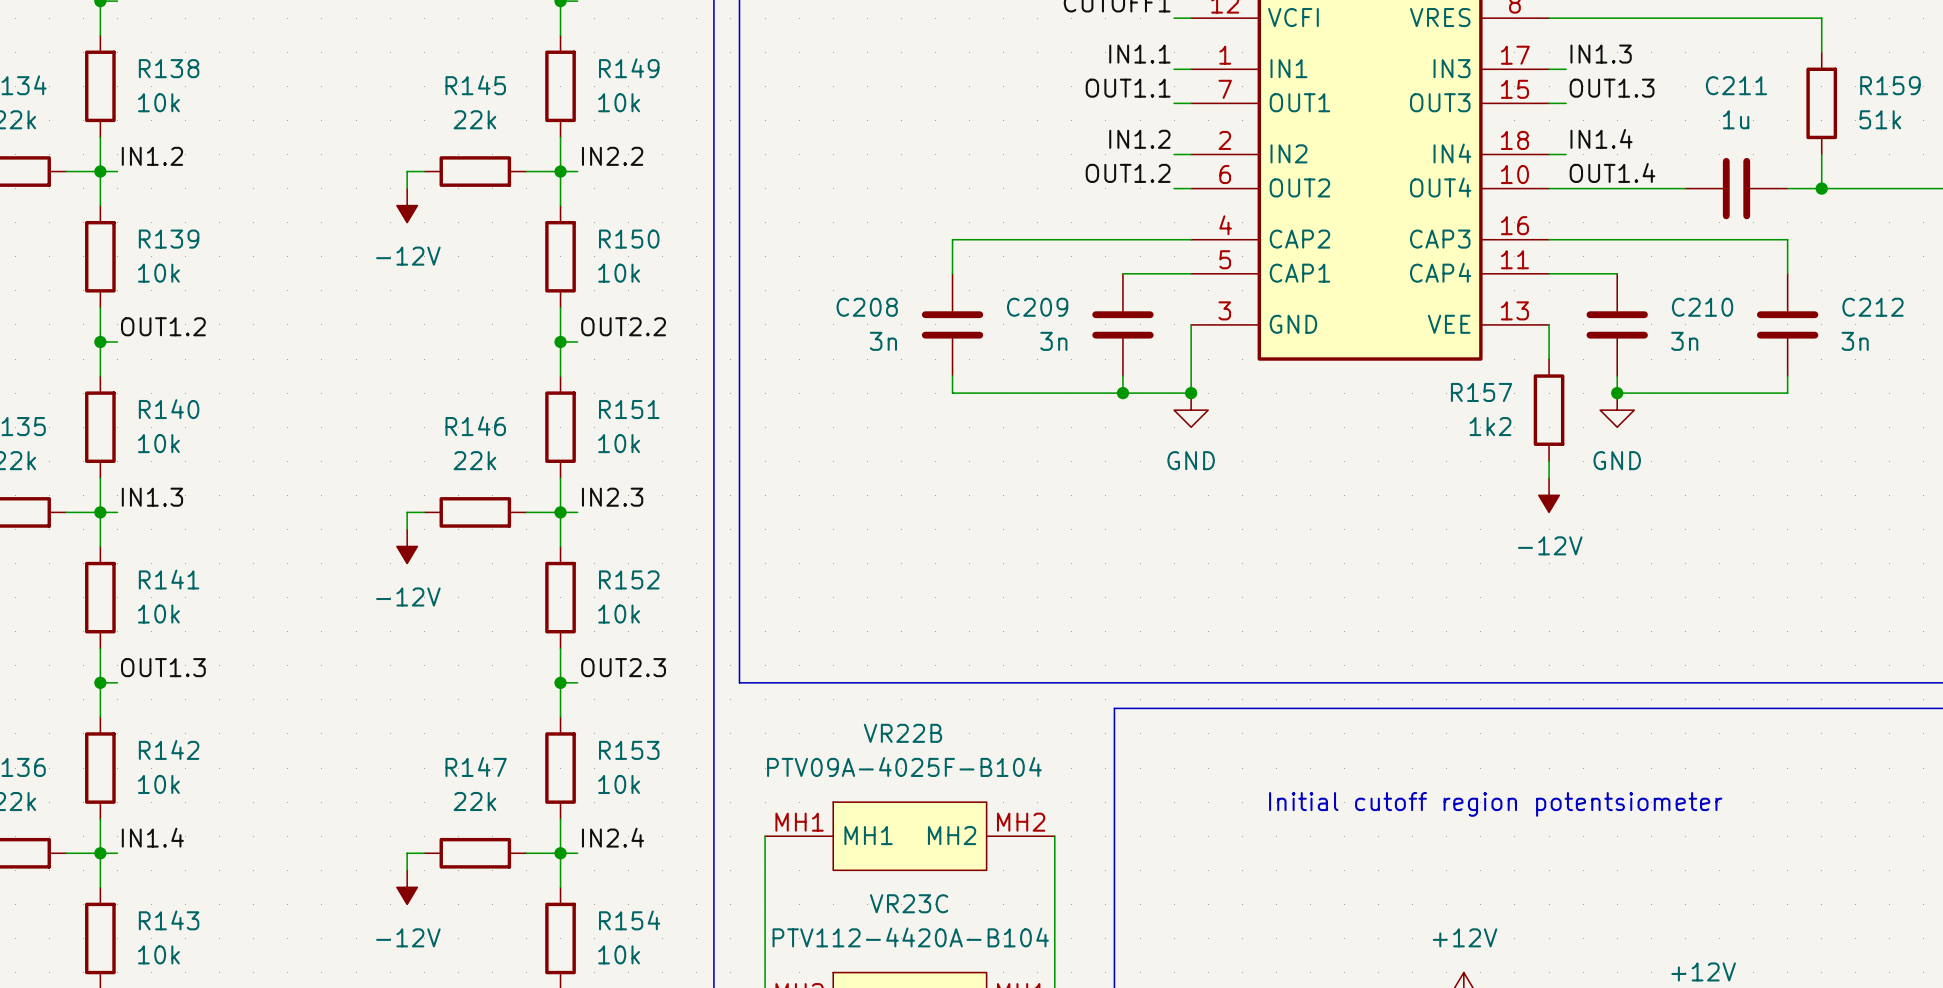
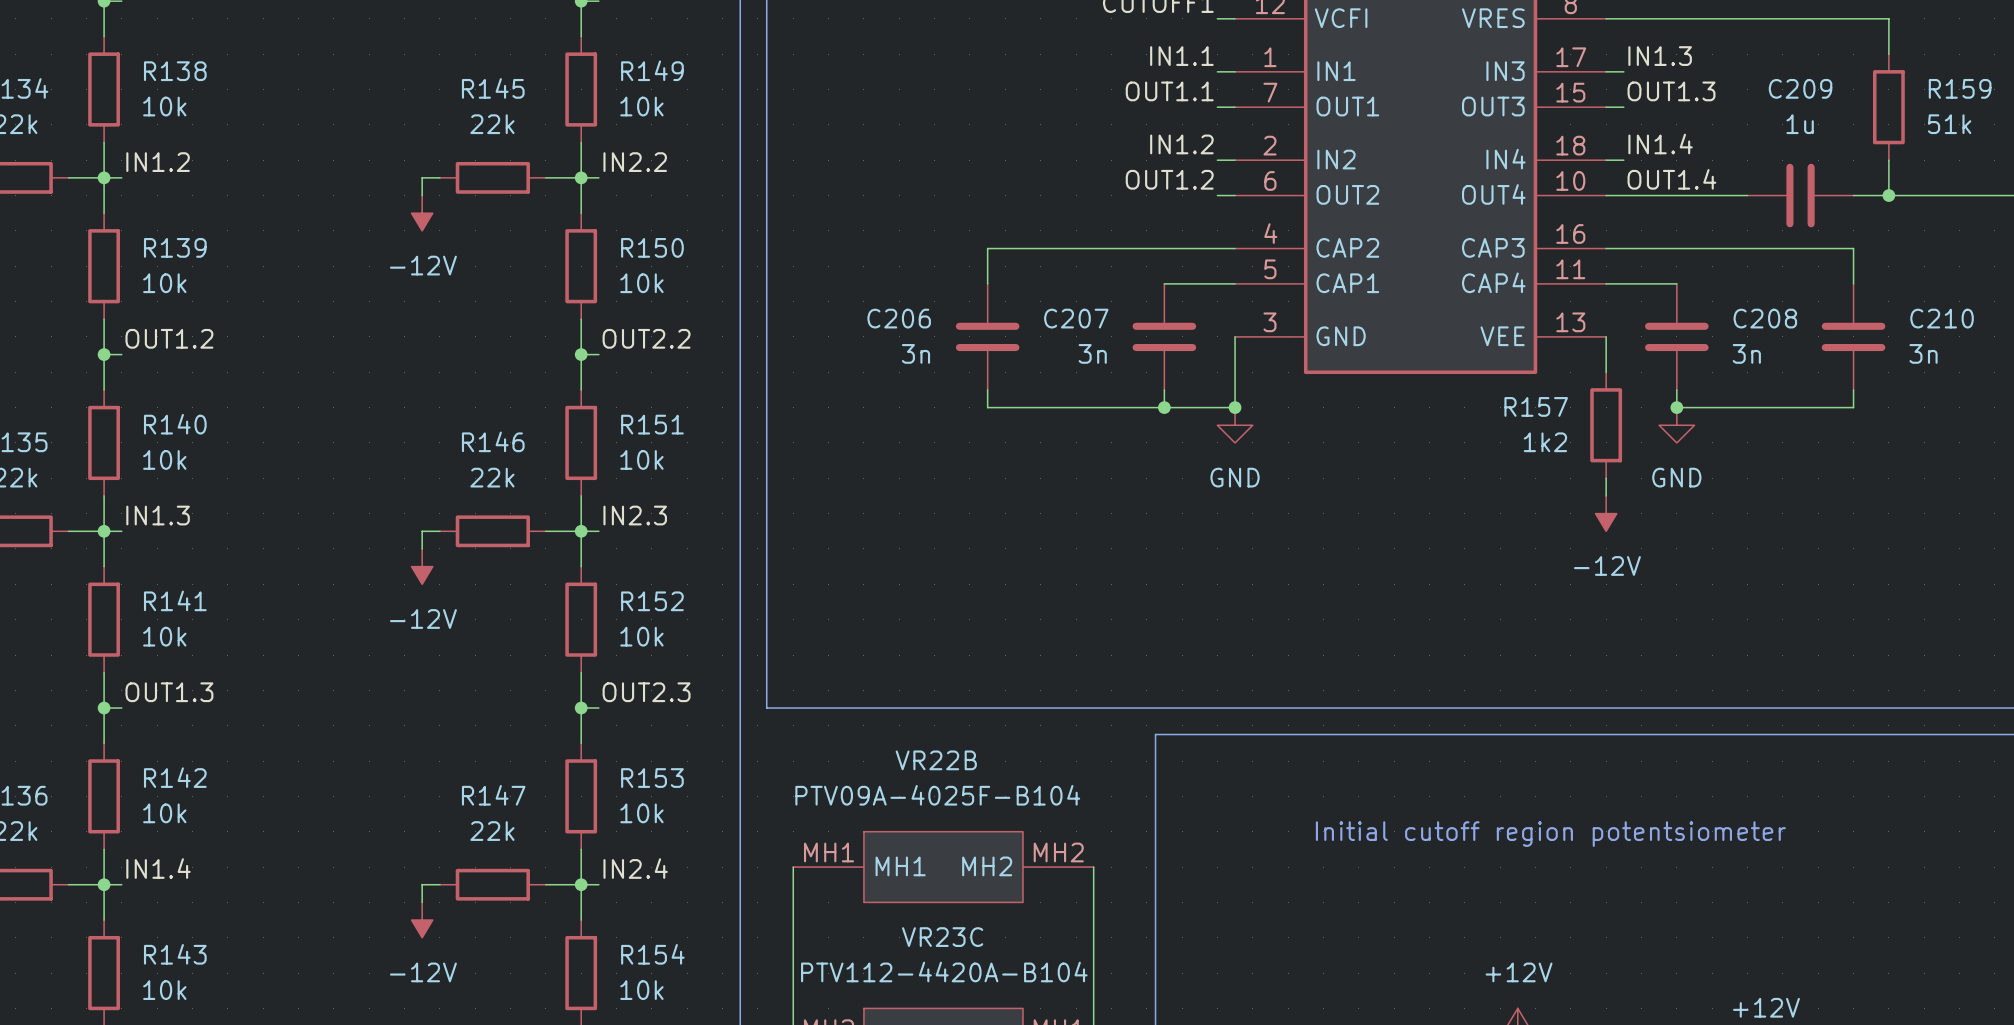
C211 name: C211 (1736, 85) -> C209 (1800, 88)
C208 name: C208 (867, 307) -> C206 (899, 318)
C209 name: C209 (1037, 307) -> C207 (1076, 318)
C210 name: C210 (1702, 307) -> C208 (1765, 318)
C212 name: C212 (1872, 307) -> C210 (1942, 318)

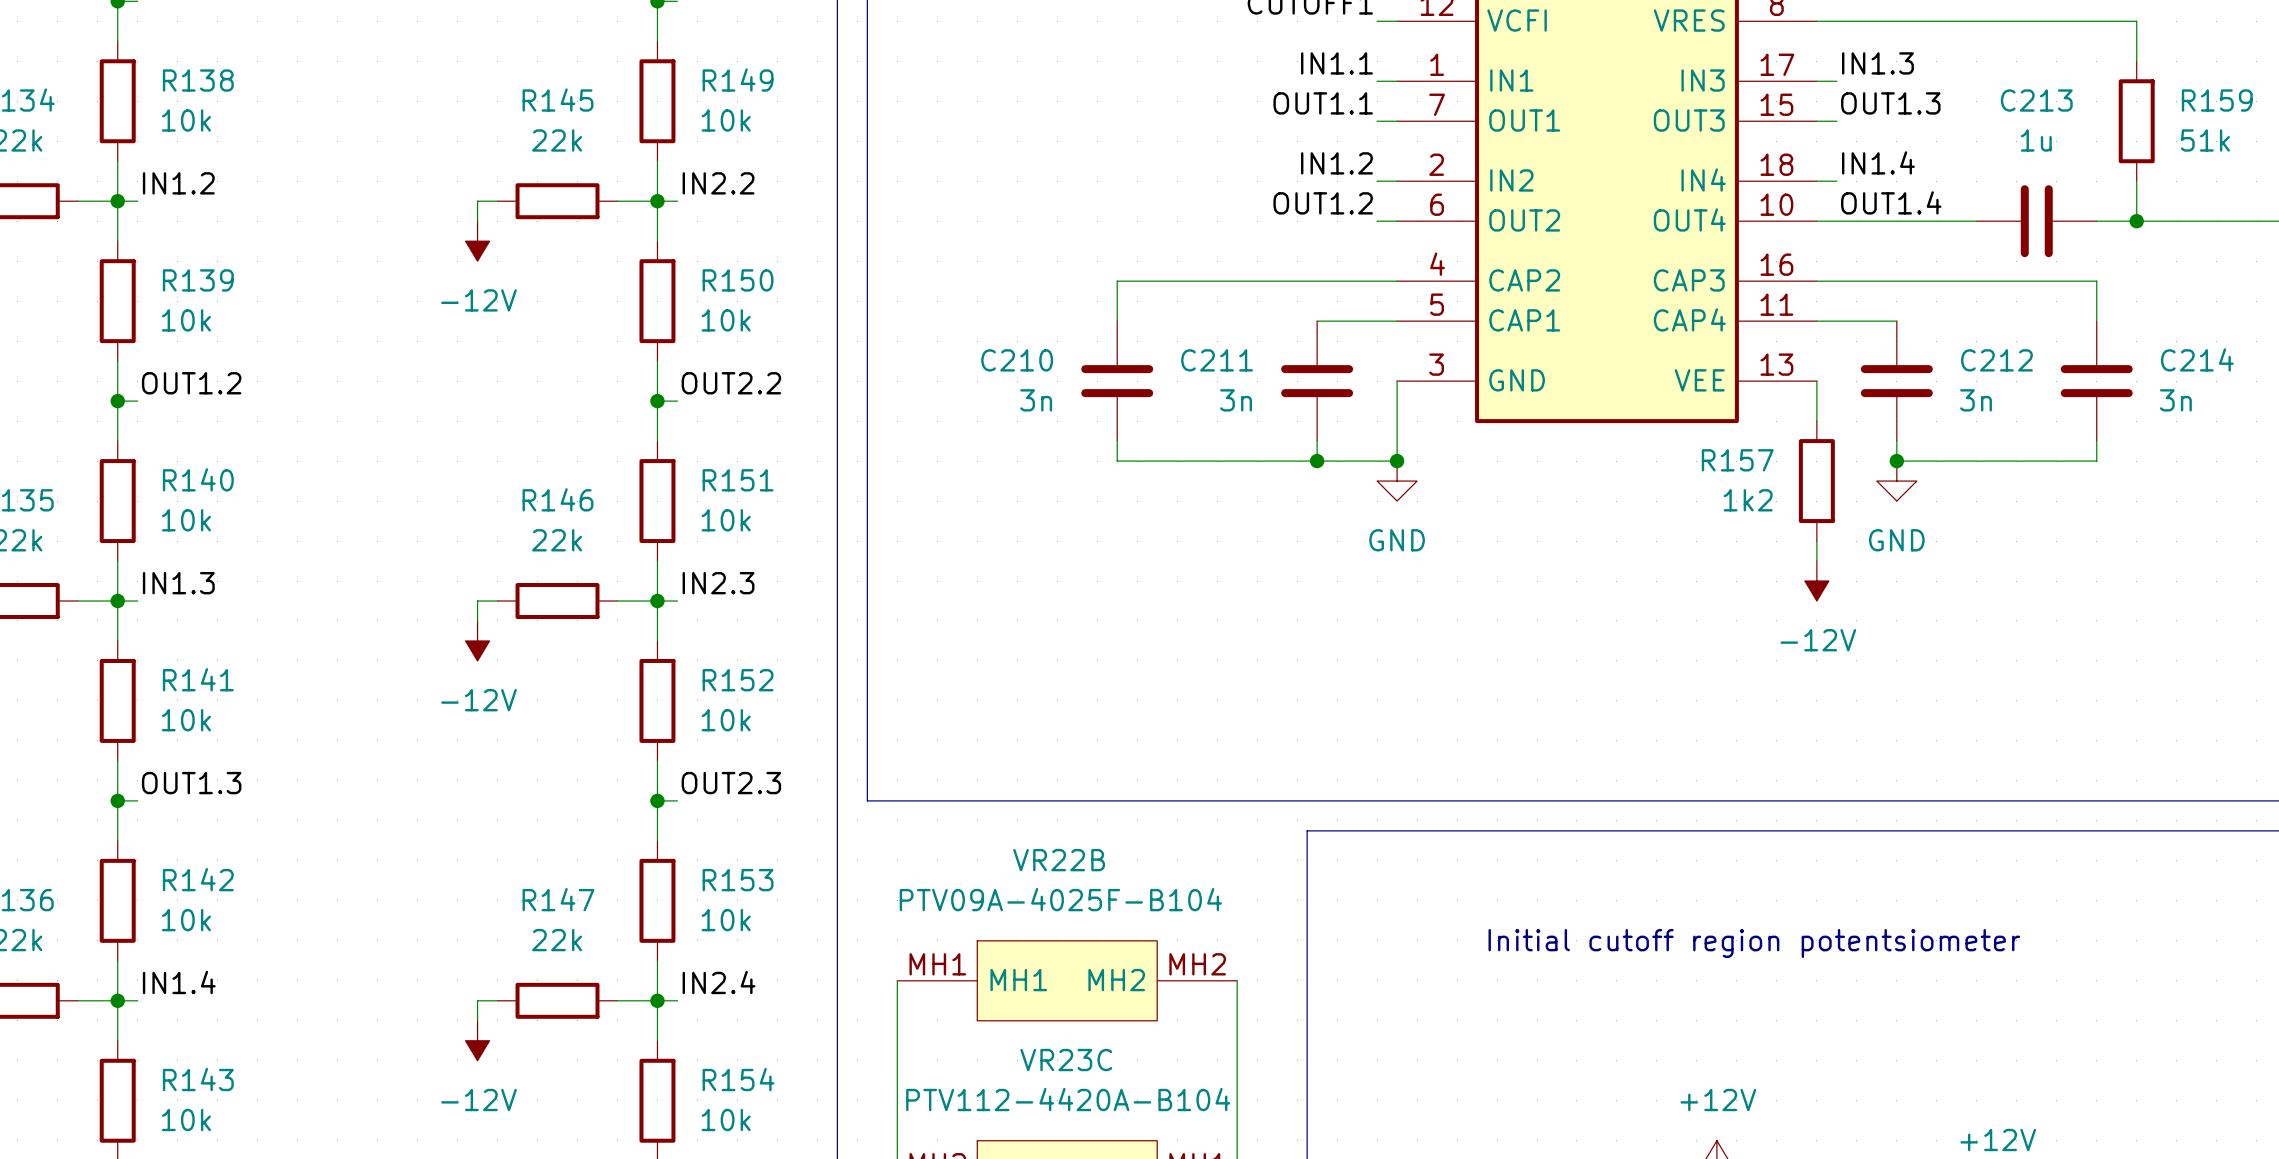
C209 name: C209 (1800, 88) -> C213 (2036, 100)
C206 name: C206 (899, 318) -> C210 (1017, 360)
C207 name: C207 (1076, 318) -> C211 (1217, 360)
C208 name: C208 (1765, 318) -> C212 (1996, 360)
C210 name: C210 (1942, 318) -> C214 (2197, 359)

